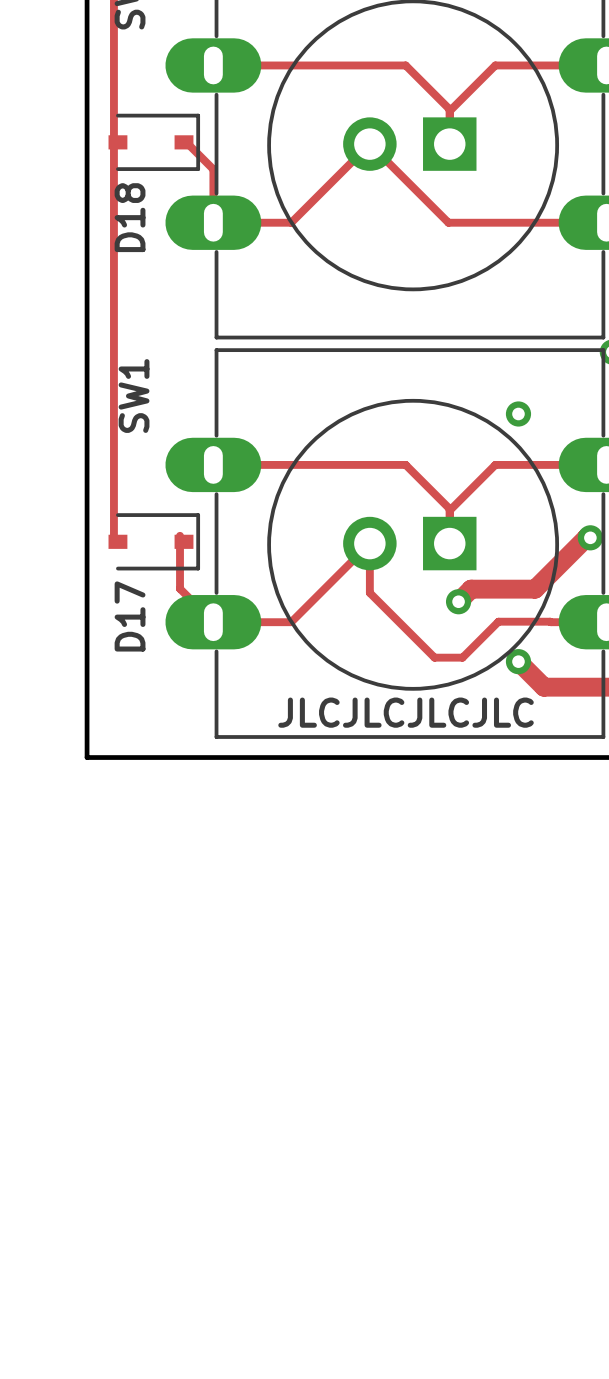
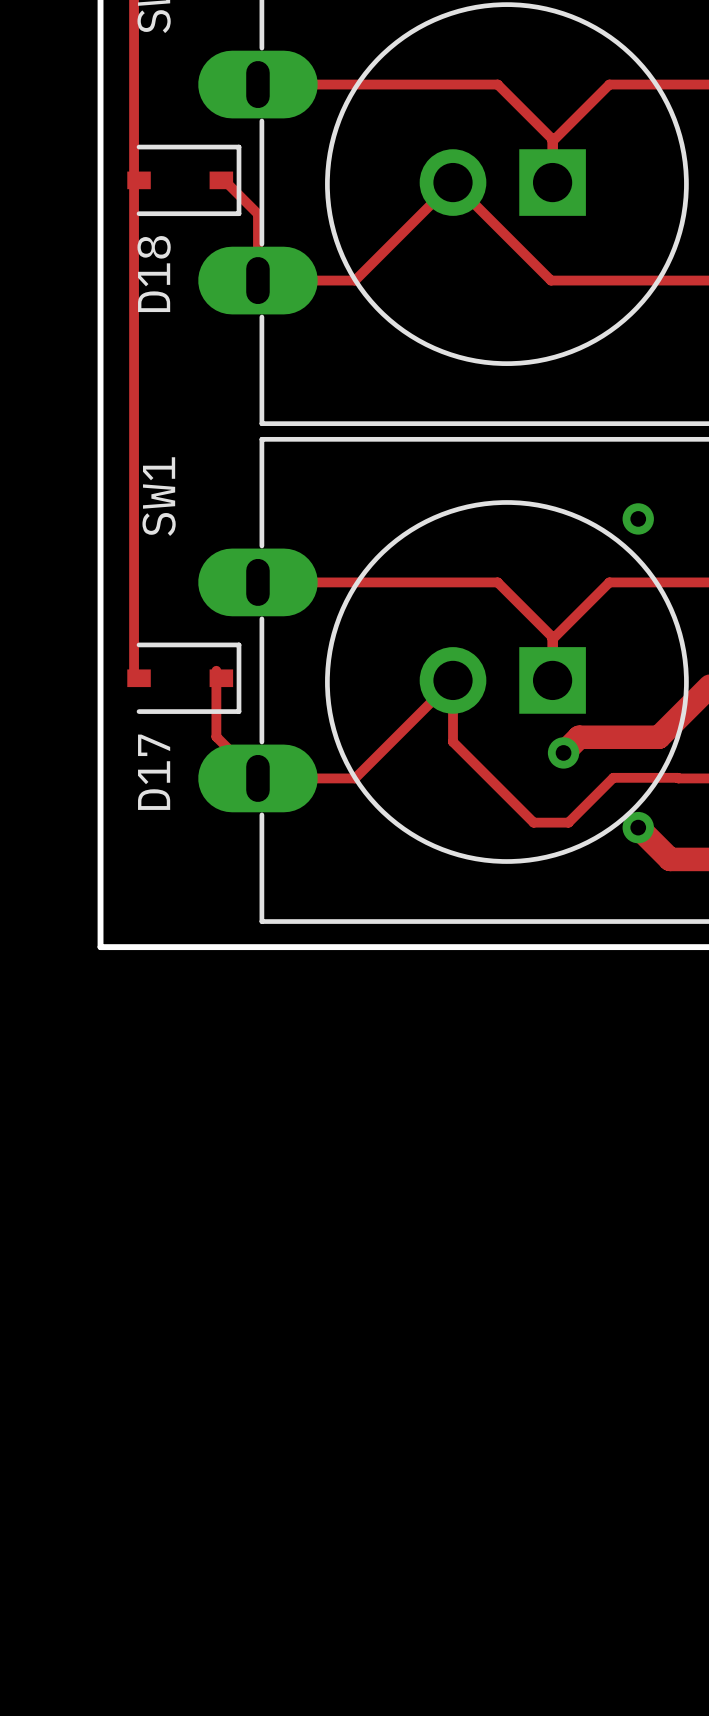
text: JLCJLCJLCJLC (406, 712) -> none

